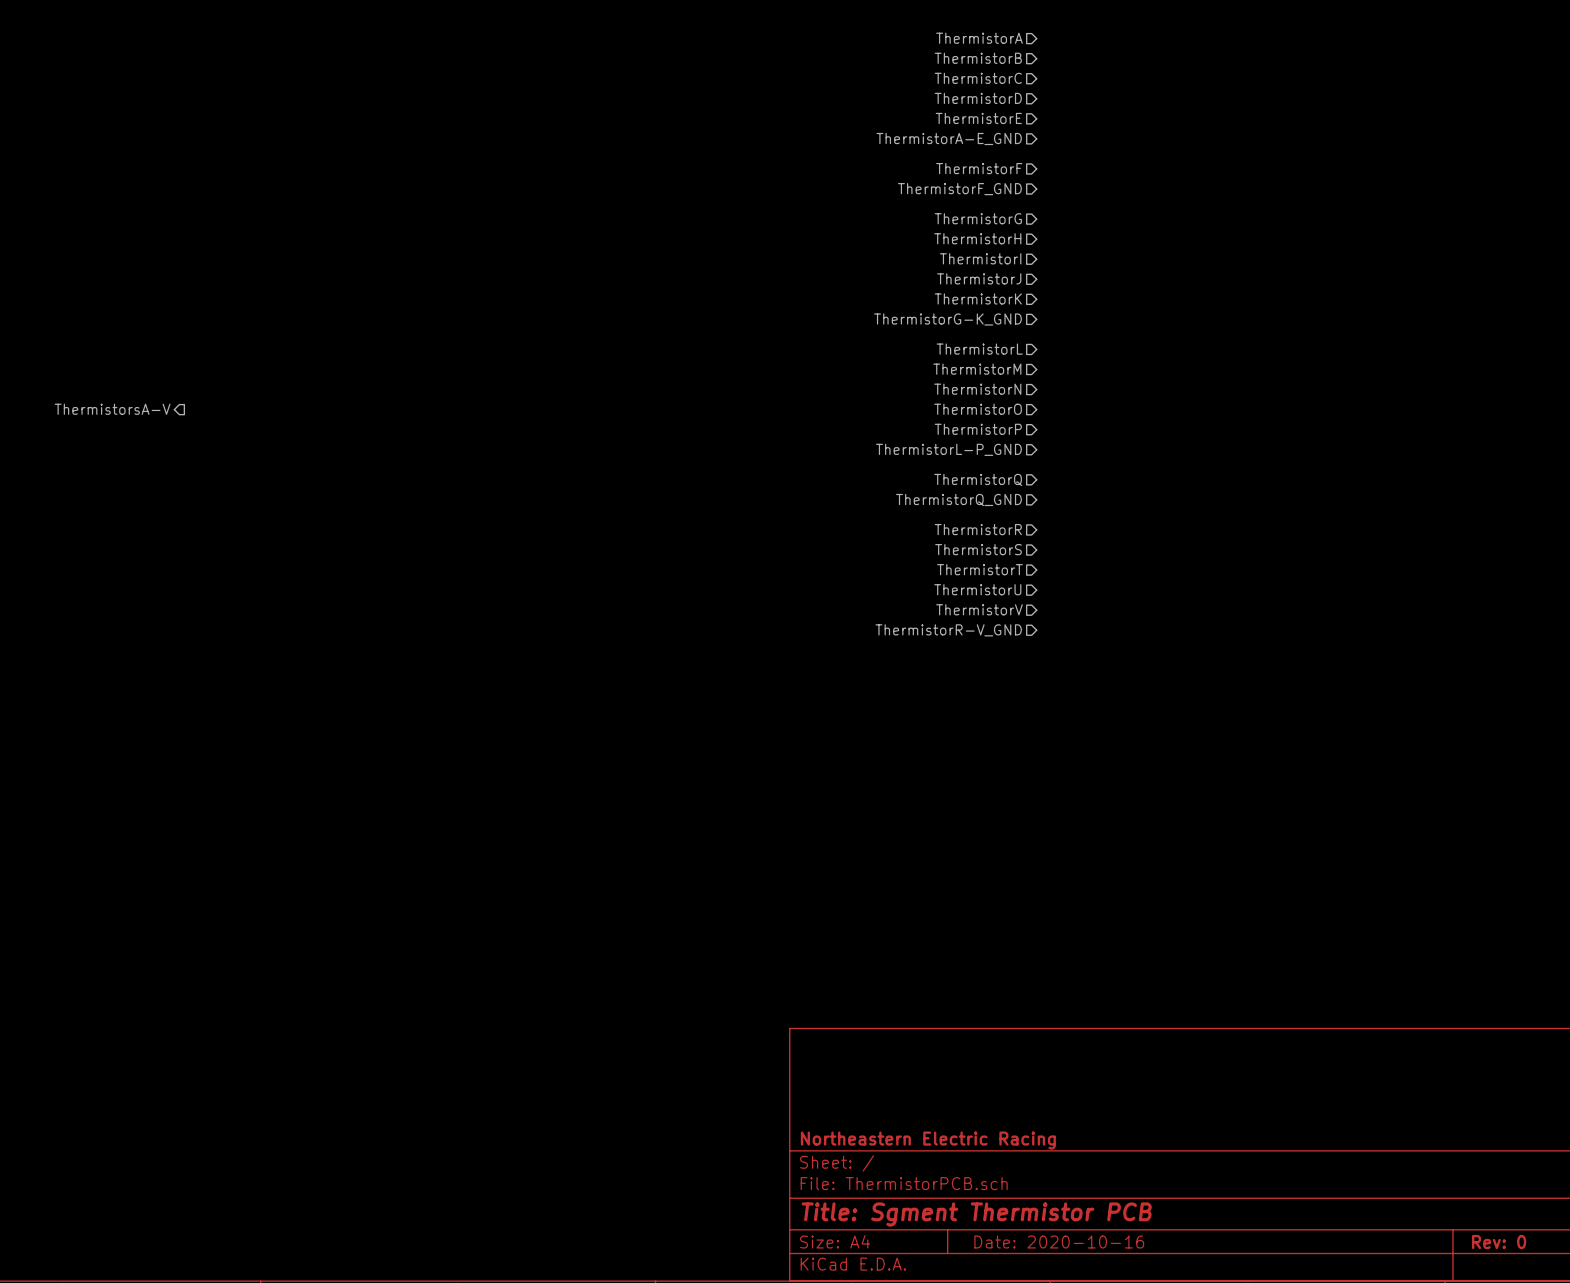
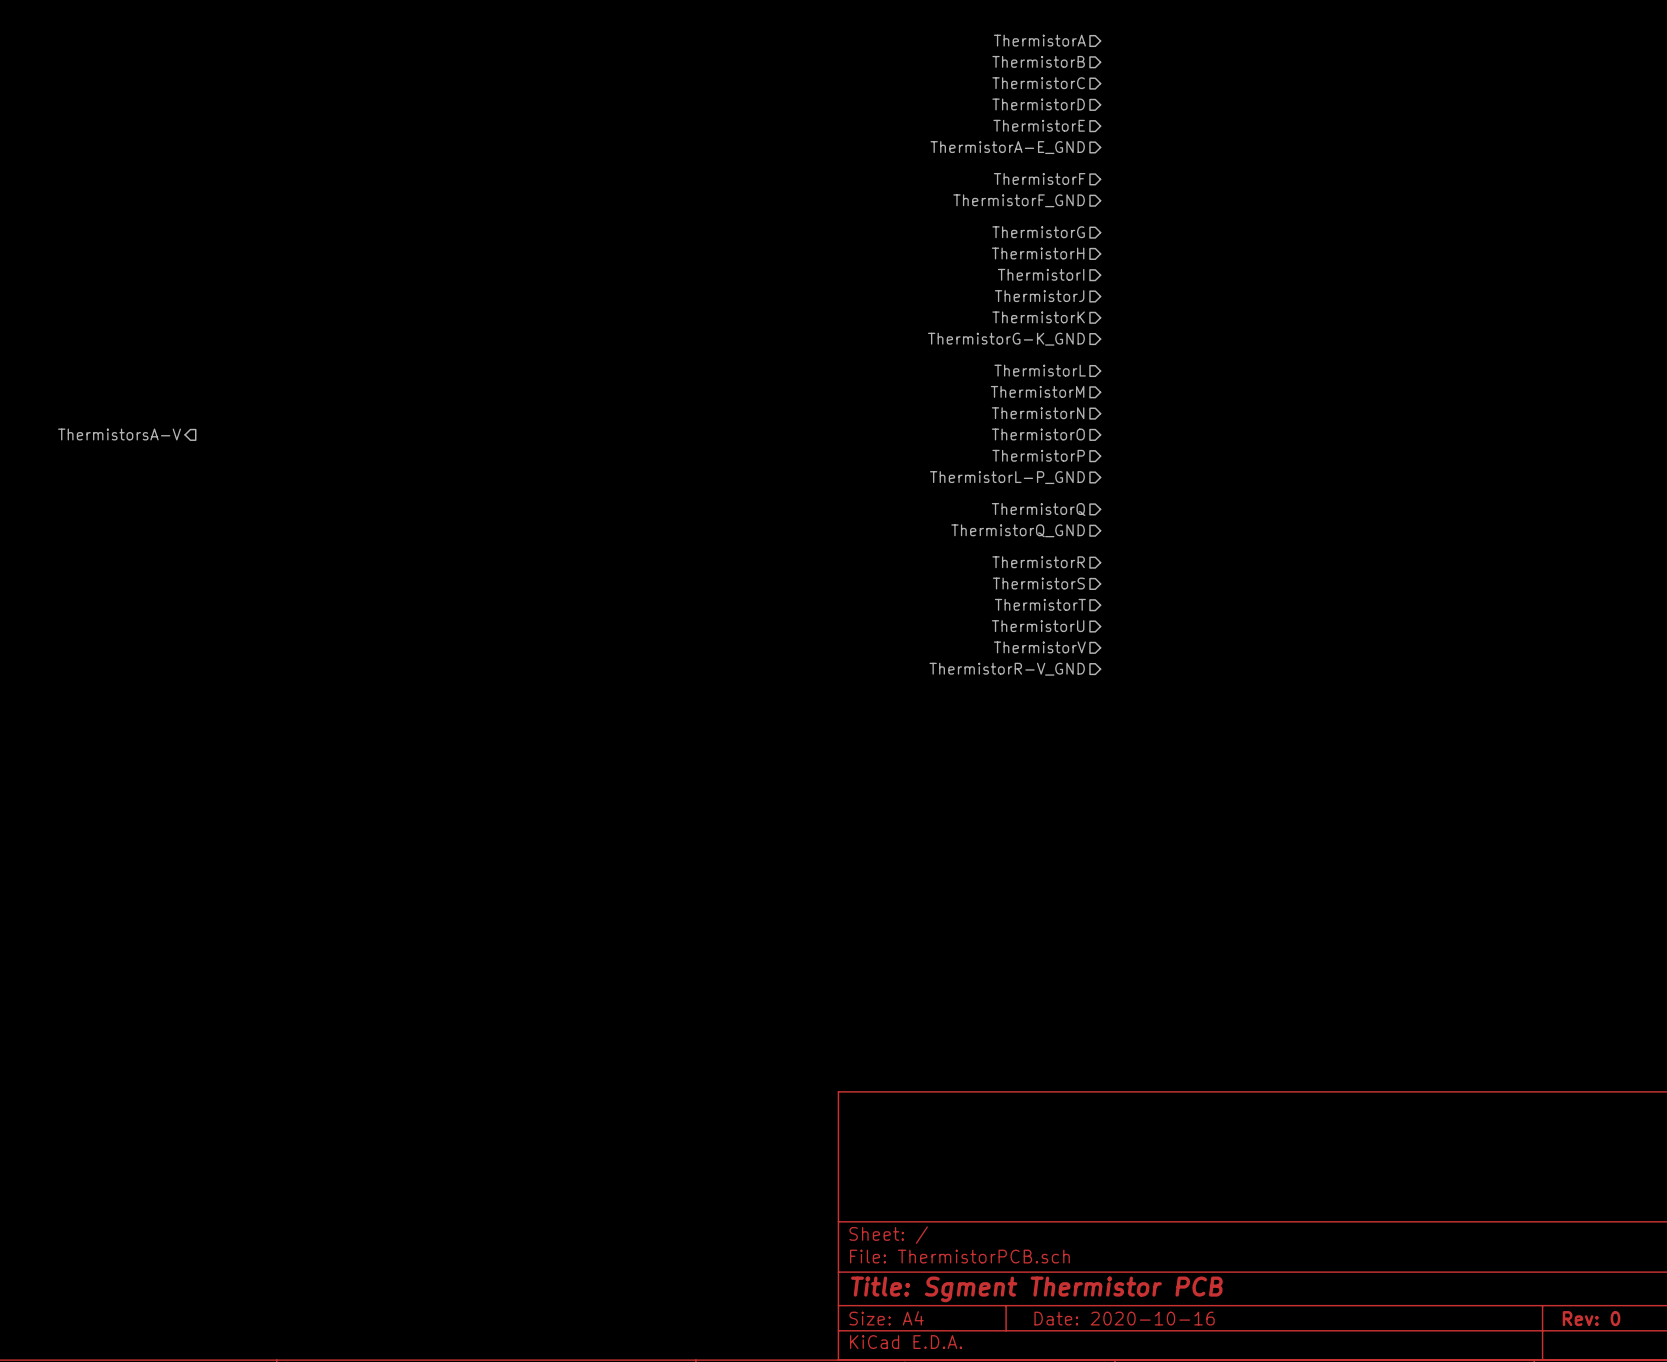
title block: Northeastern Electric Racing (928, 1140) -> none

